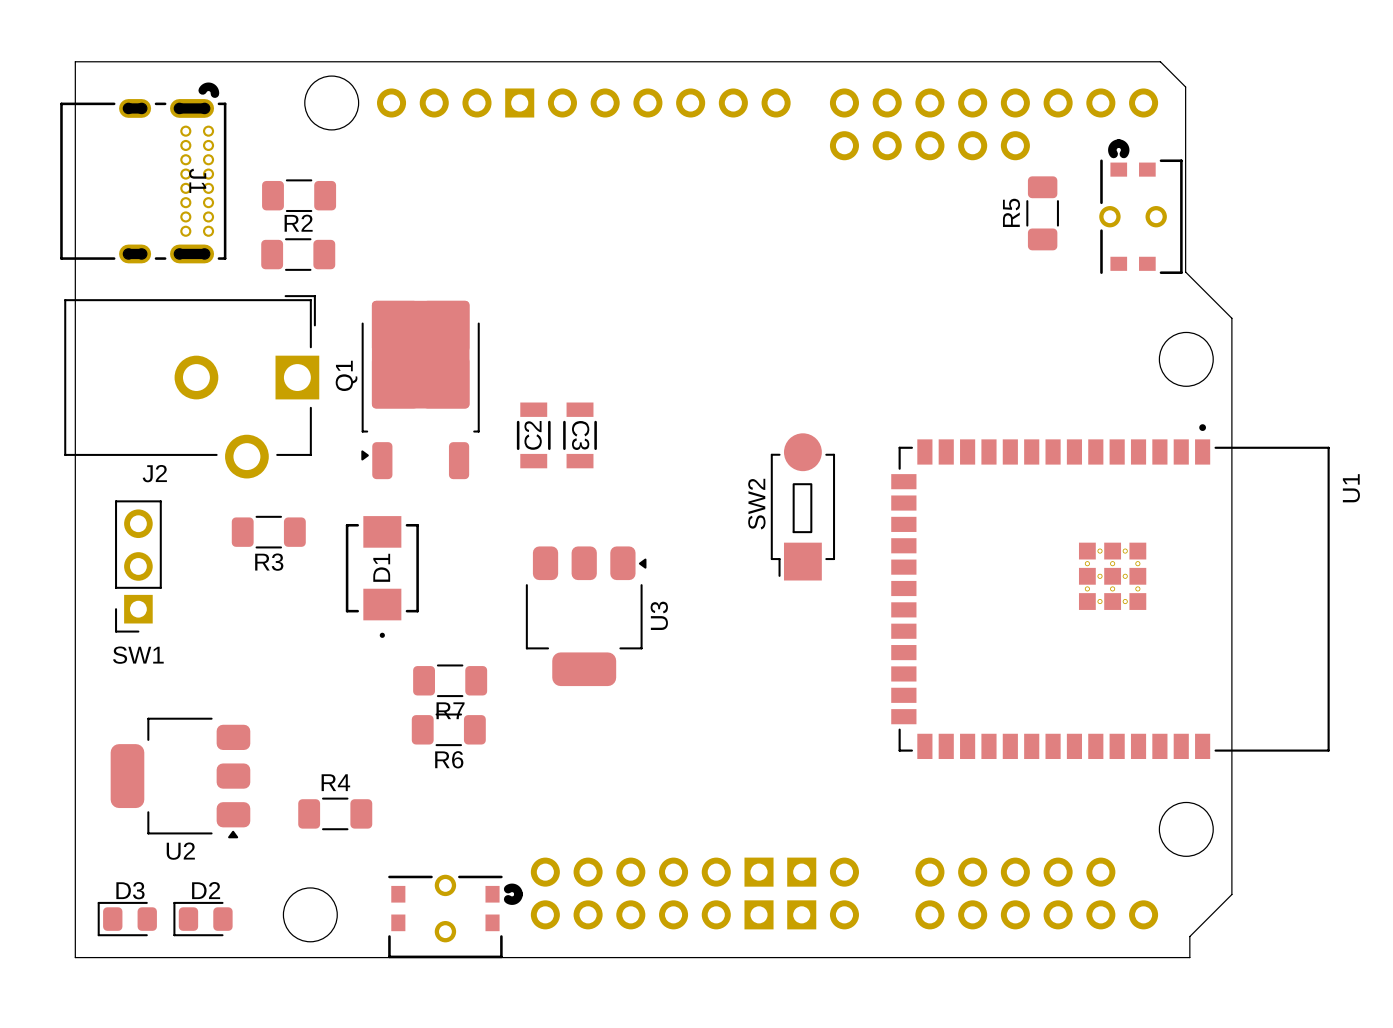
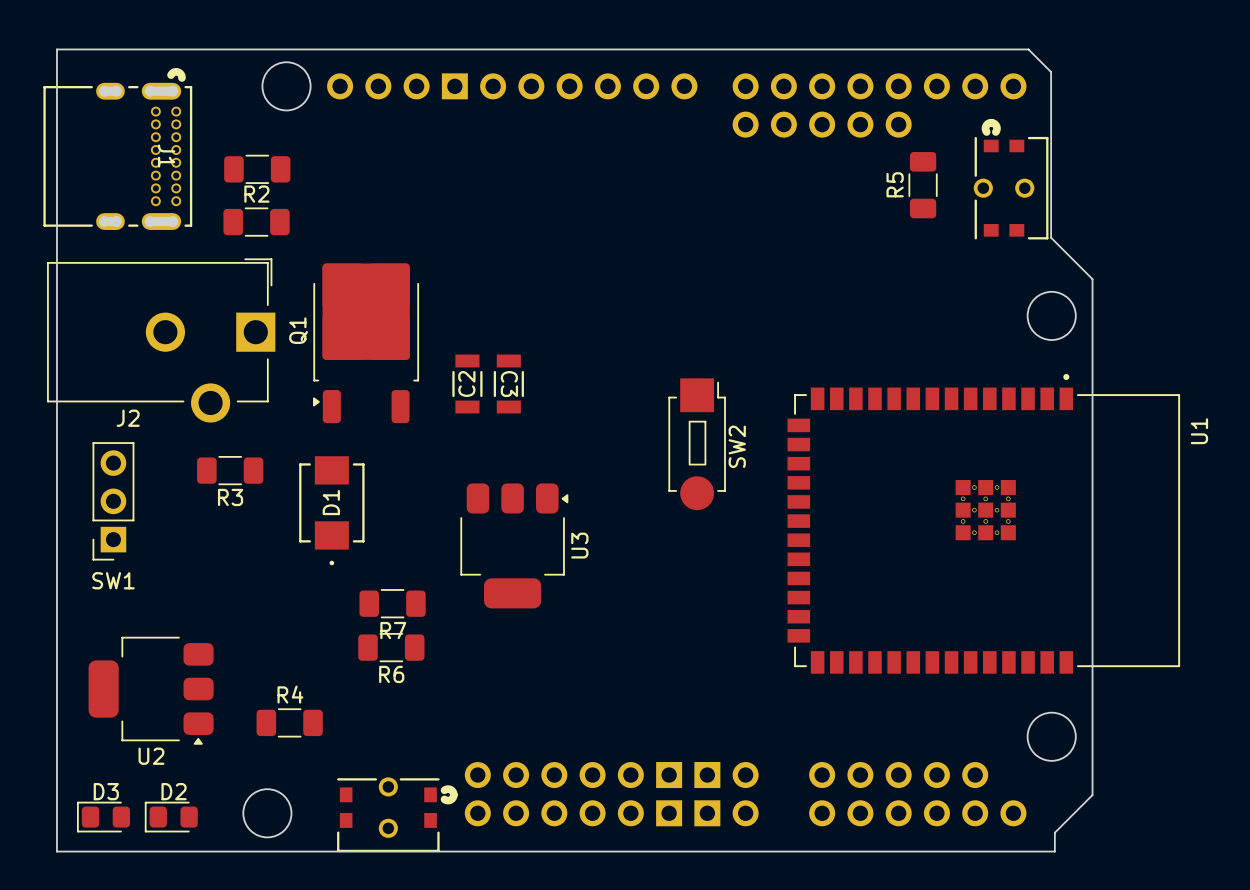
SW2 rotation: 0° (802, 506) -> 180° (697, 444)

